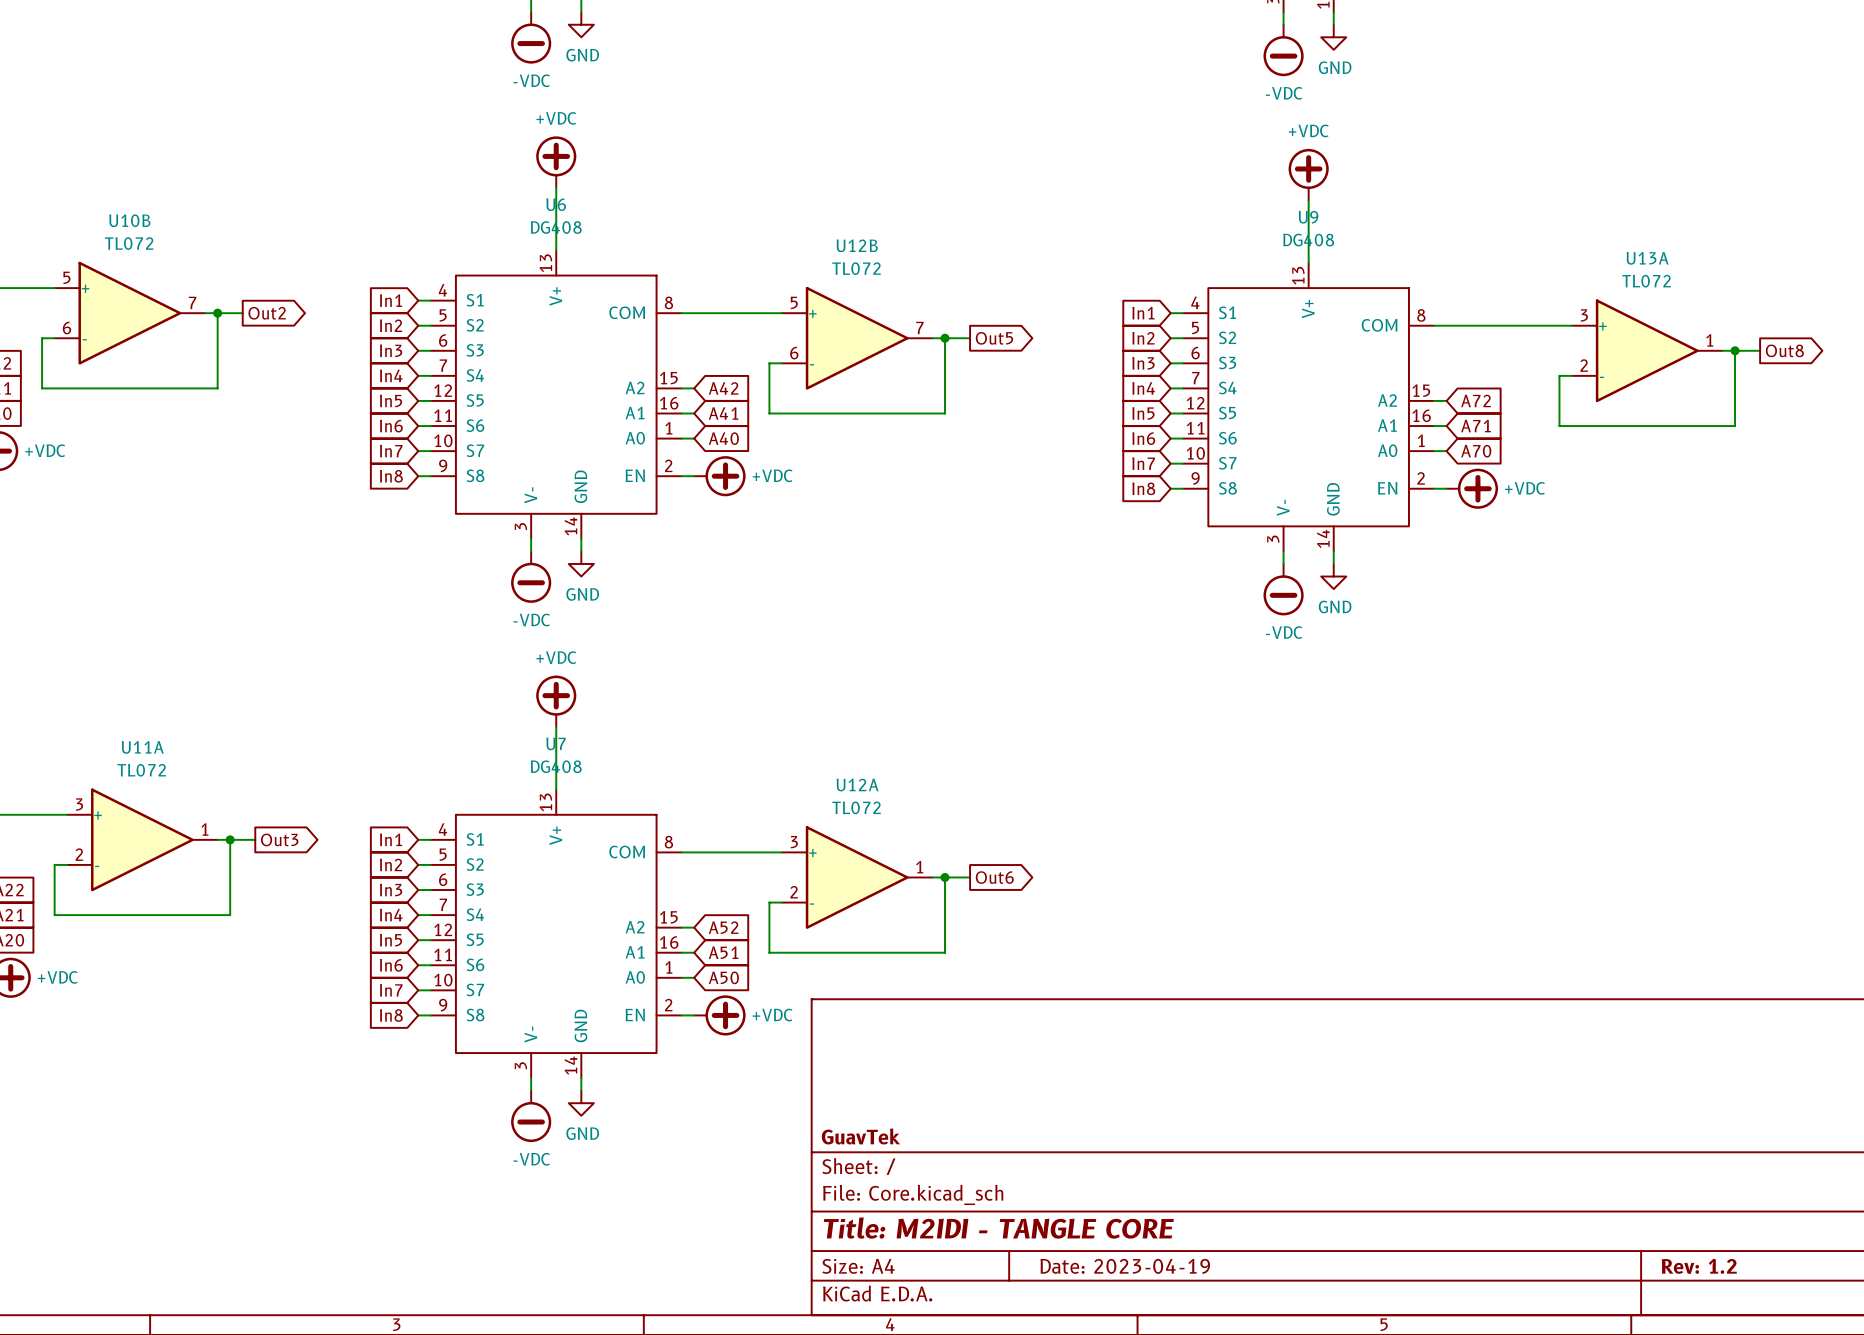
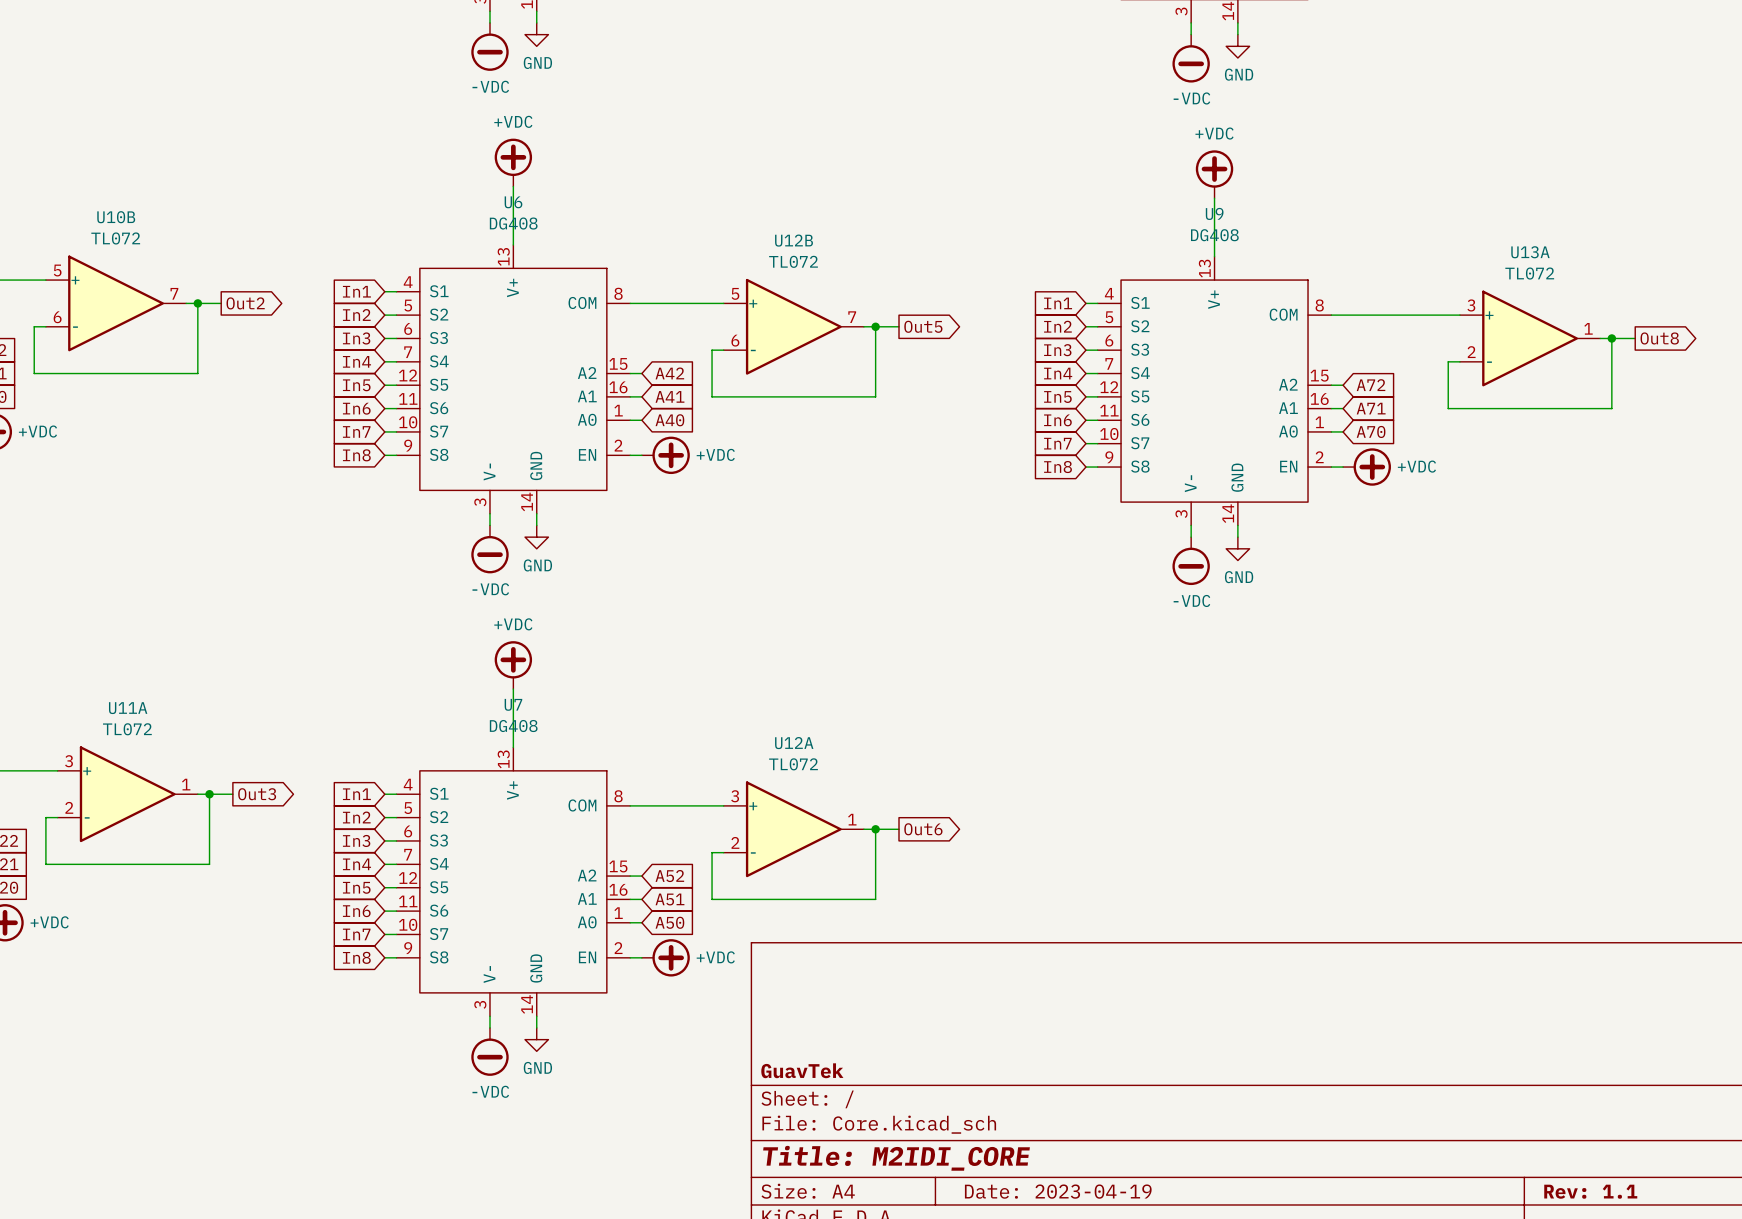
title block: Title: M2IDI - TANGLE CORE (998, 1228) -> Title: M2IDI_CORE (896, 1158)
title block: Rev: 1.2 (1699, 1266) -> Rev: 1.1 (1590, 1191)

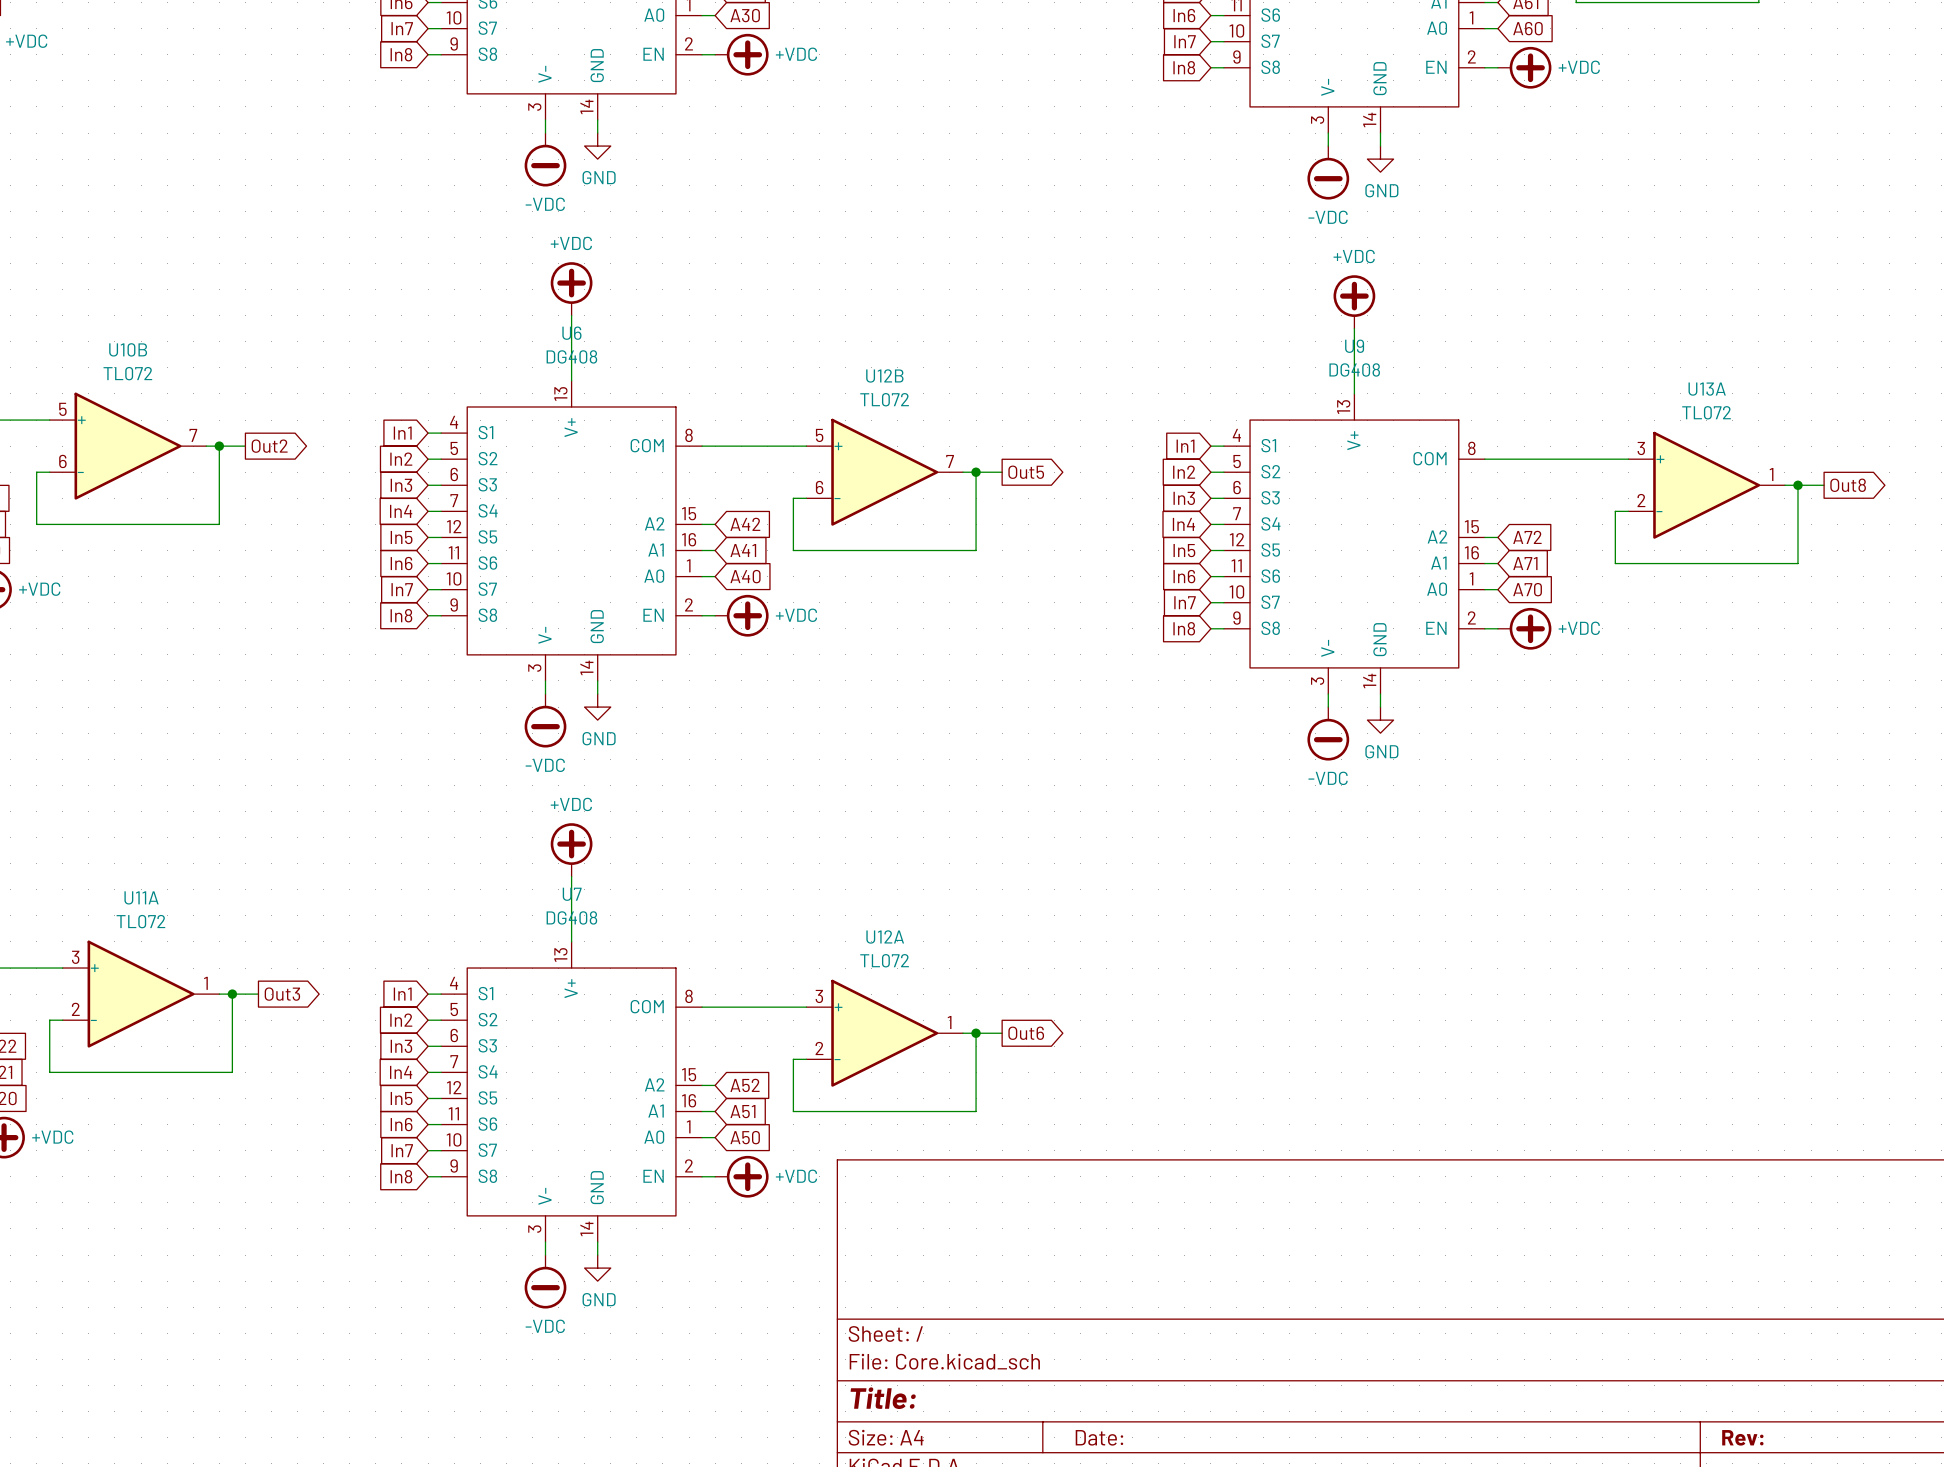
title block: GuavTek (802, 1070) -> none
title block: Title: M2IDI_CORE (896, 1158) -> Title: (883, 1398)
title block: Date: 2023-04-19 (1058, 1191) -> Date: (1099, 1437)
title block: Rev: 1.1 (1590, 1191) -> Rev: (1742, 1437)

